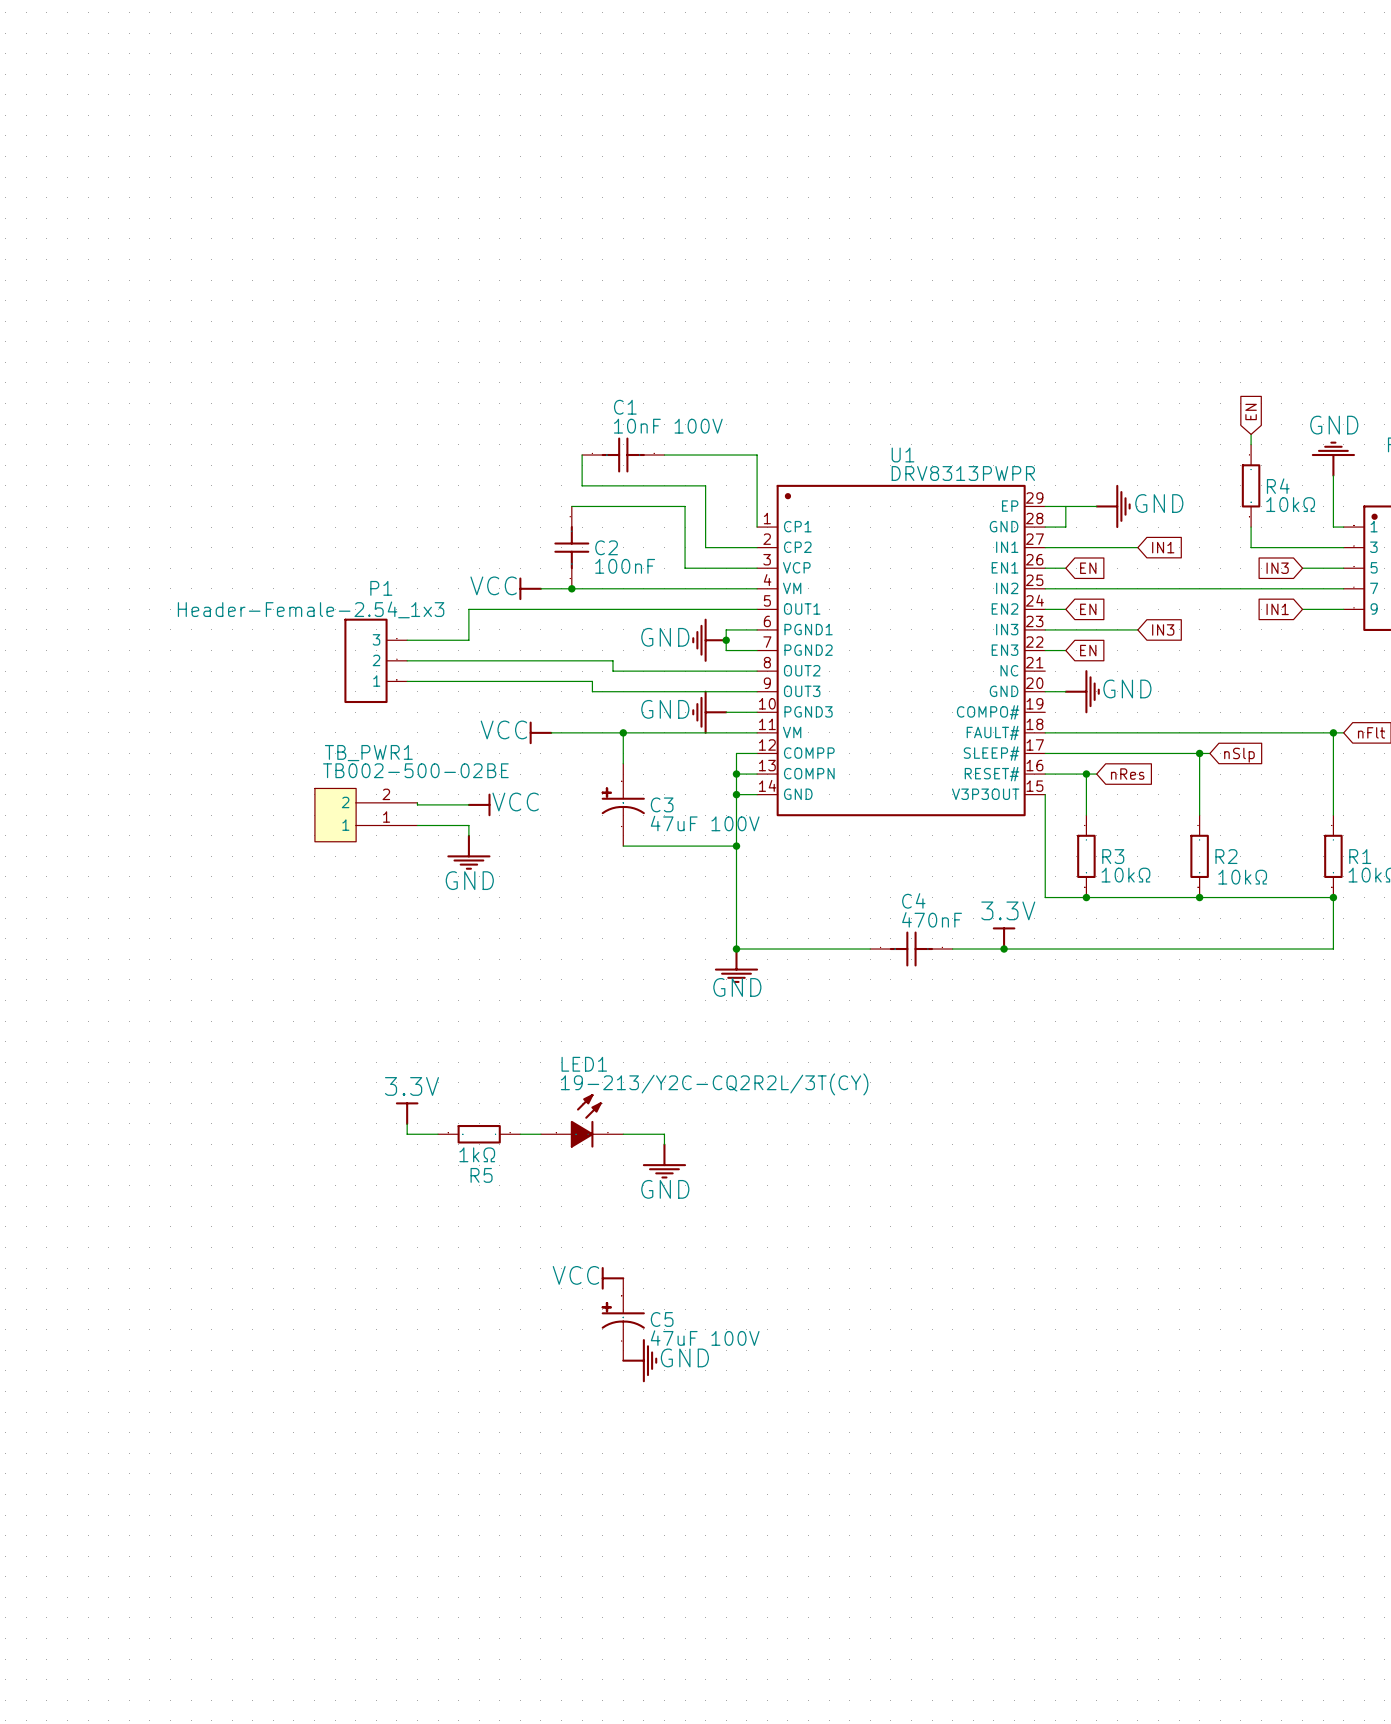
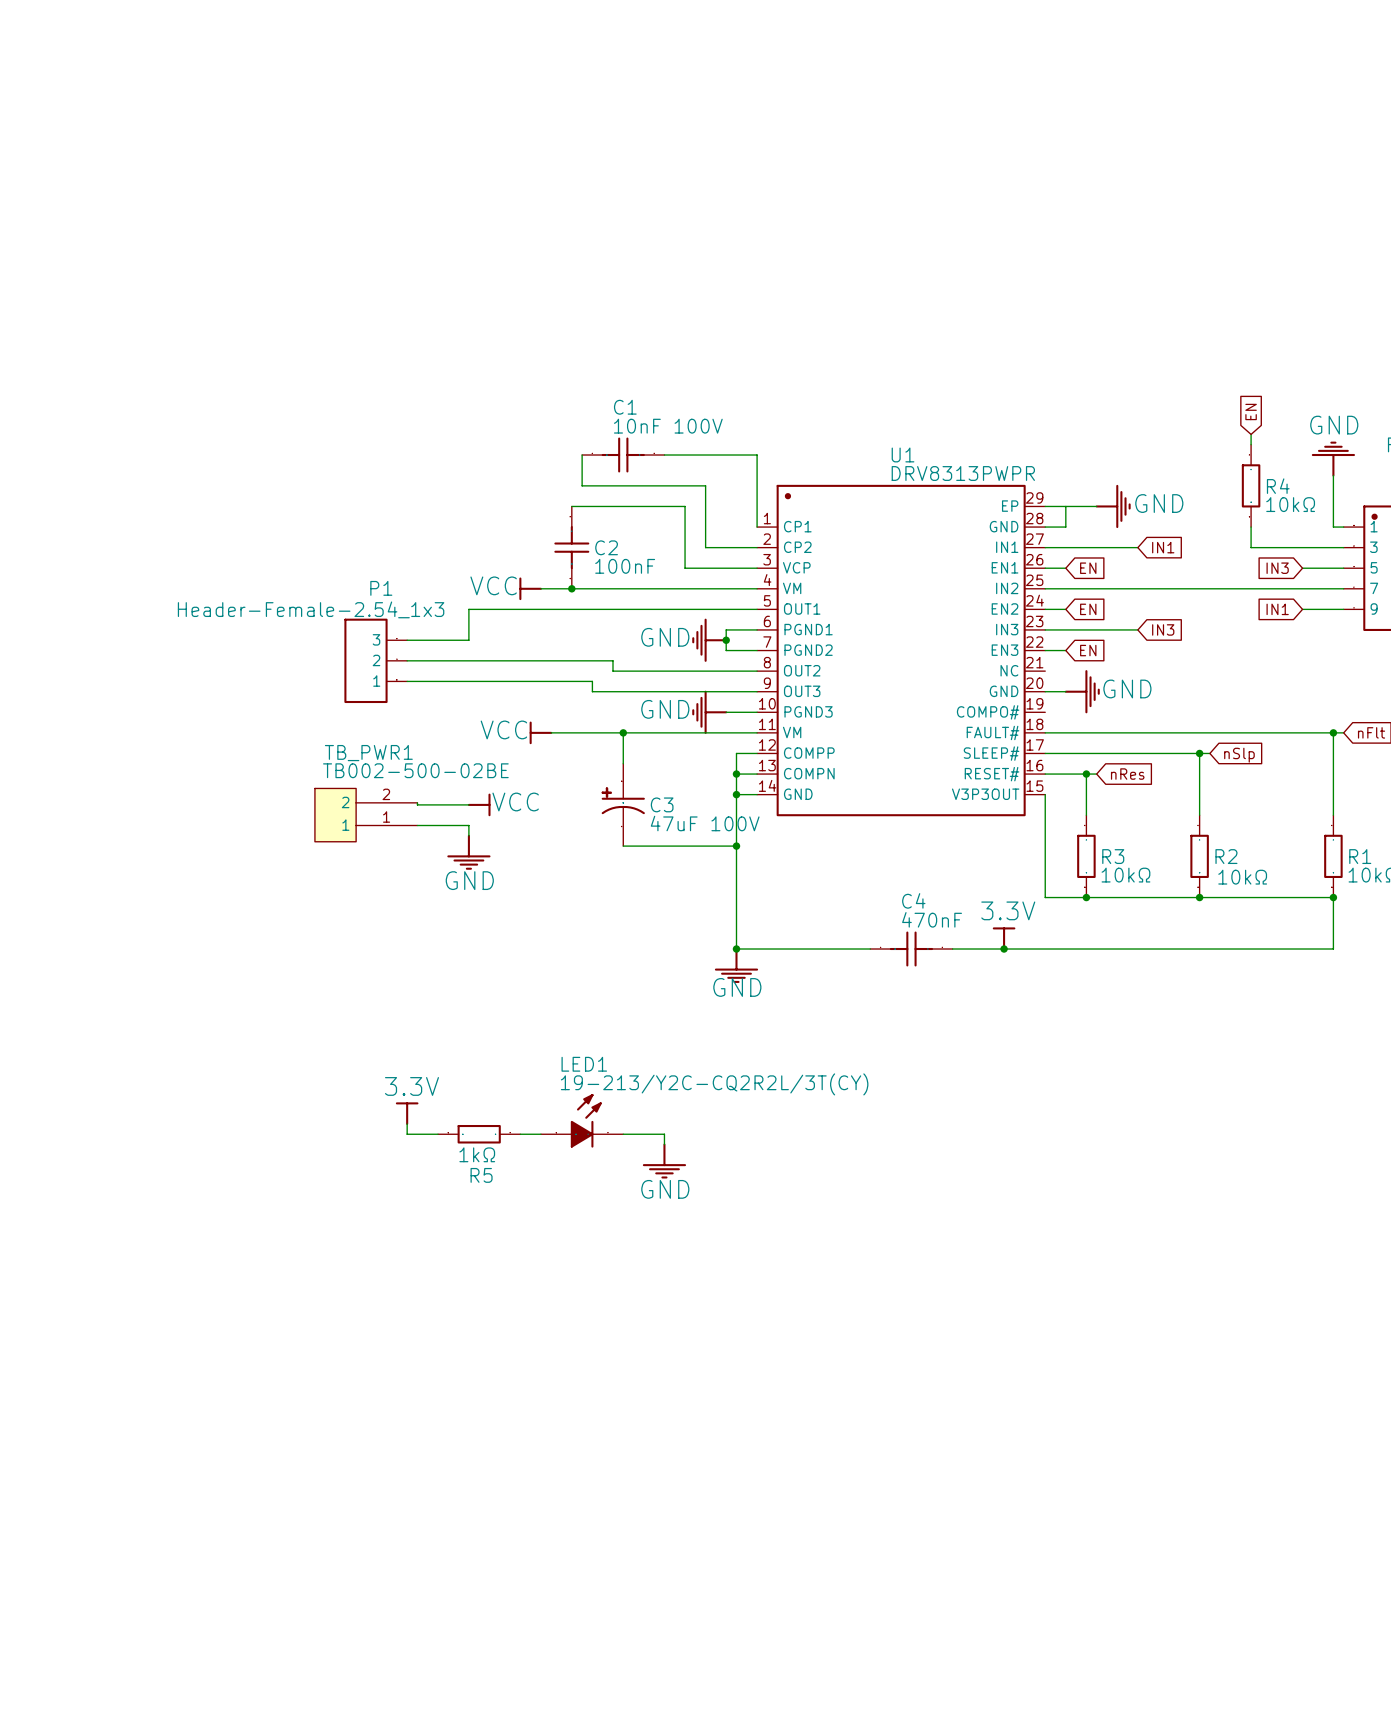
power symbol: VCC (612, 1278) -> none
C5: 47uF 100V (623, 1319) -> none
power symbol: GND (639, 1360) -> none

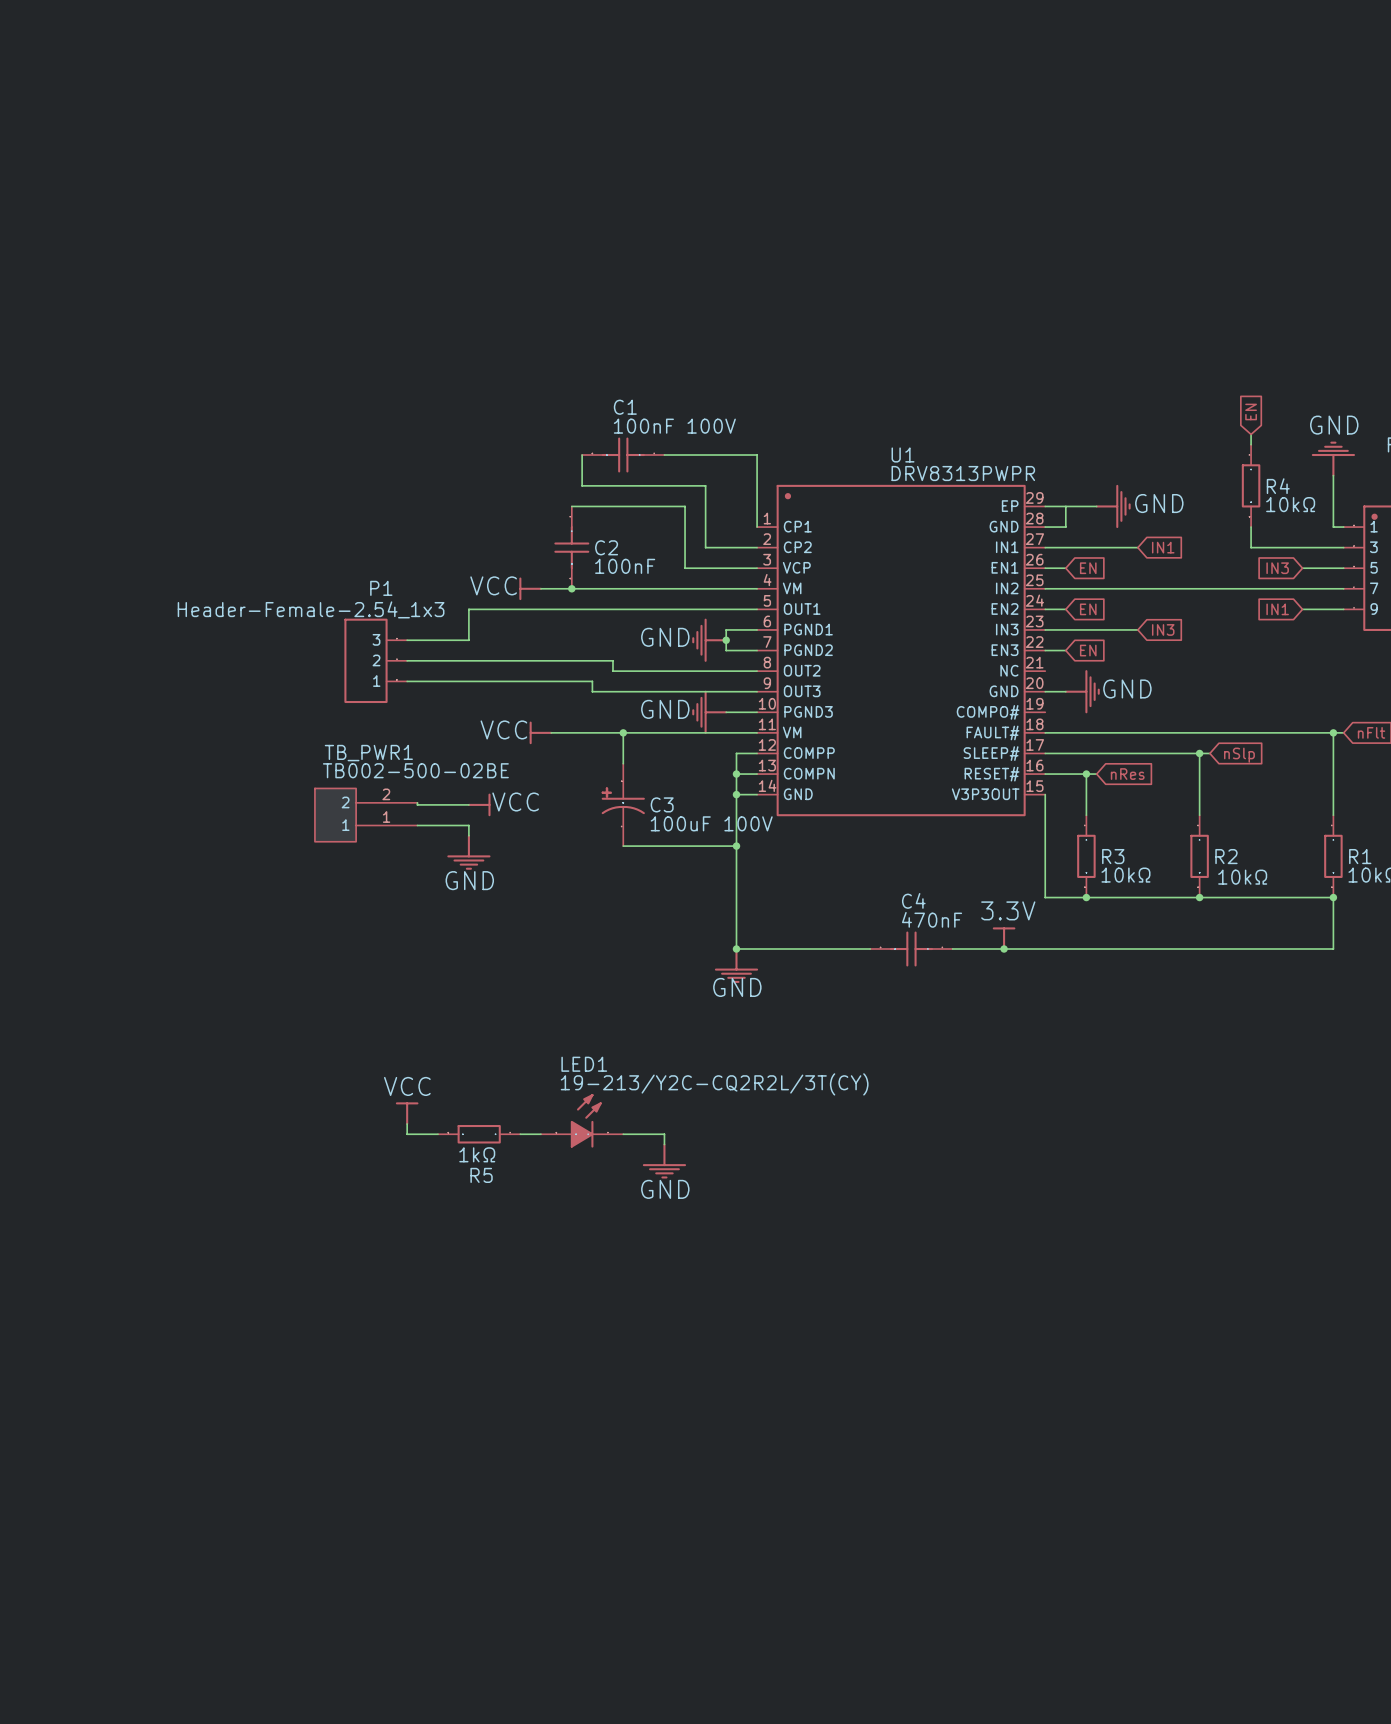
C1 value: 10nF 100V (668, 426) -> 100nF 100V (674, 426)
C3 value: 47uF 100V (705, 823) -> 100uF 100V (711, 823)
power symbol: 3.3V (407, 1113) -> VCC (407, 1113)

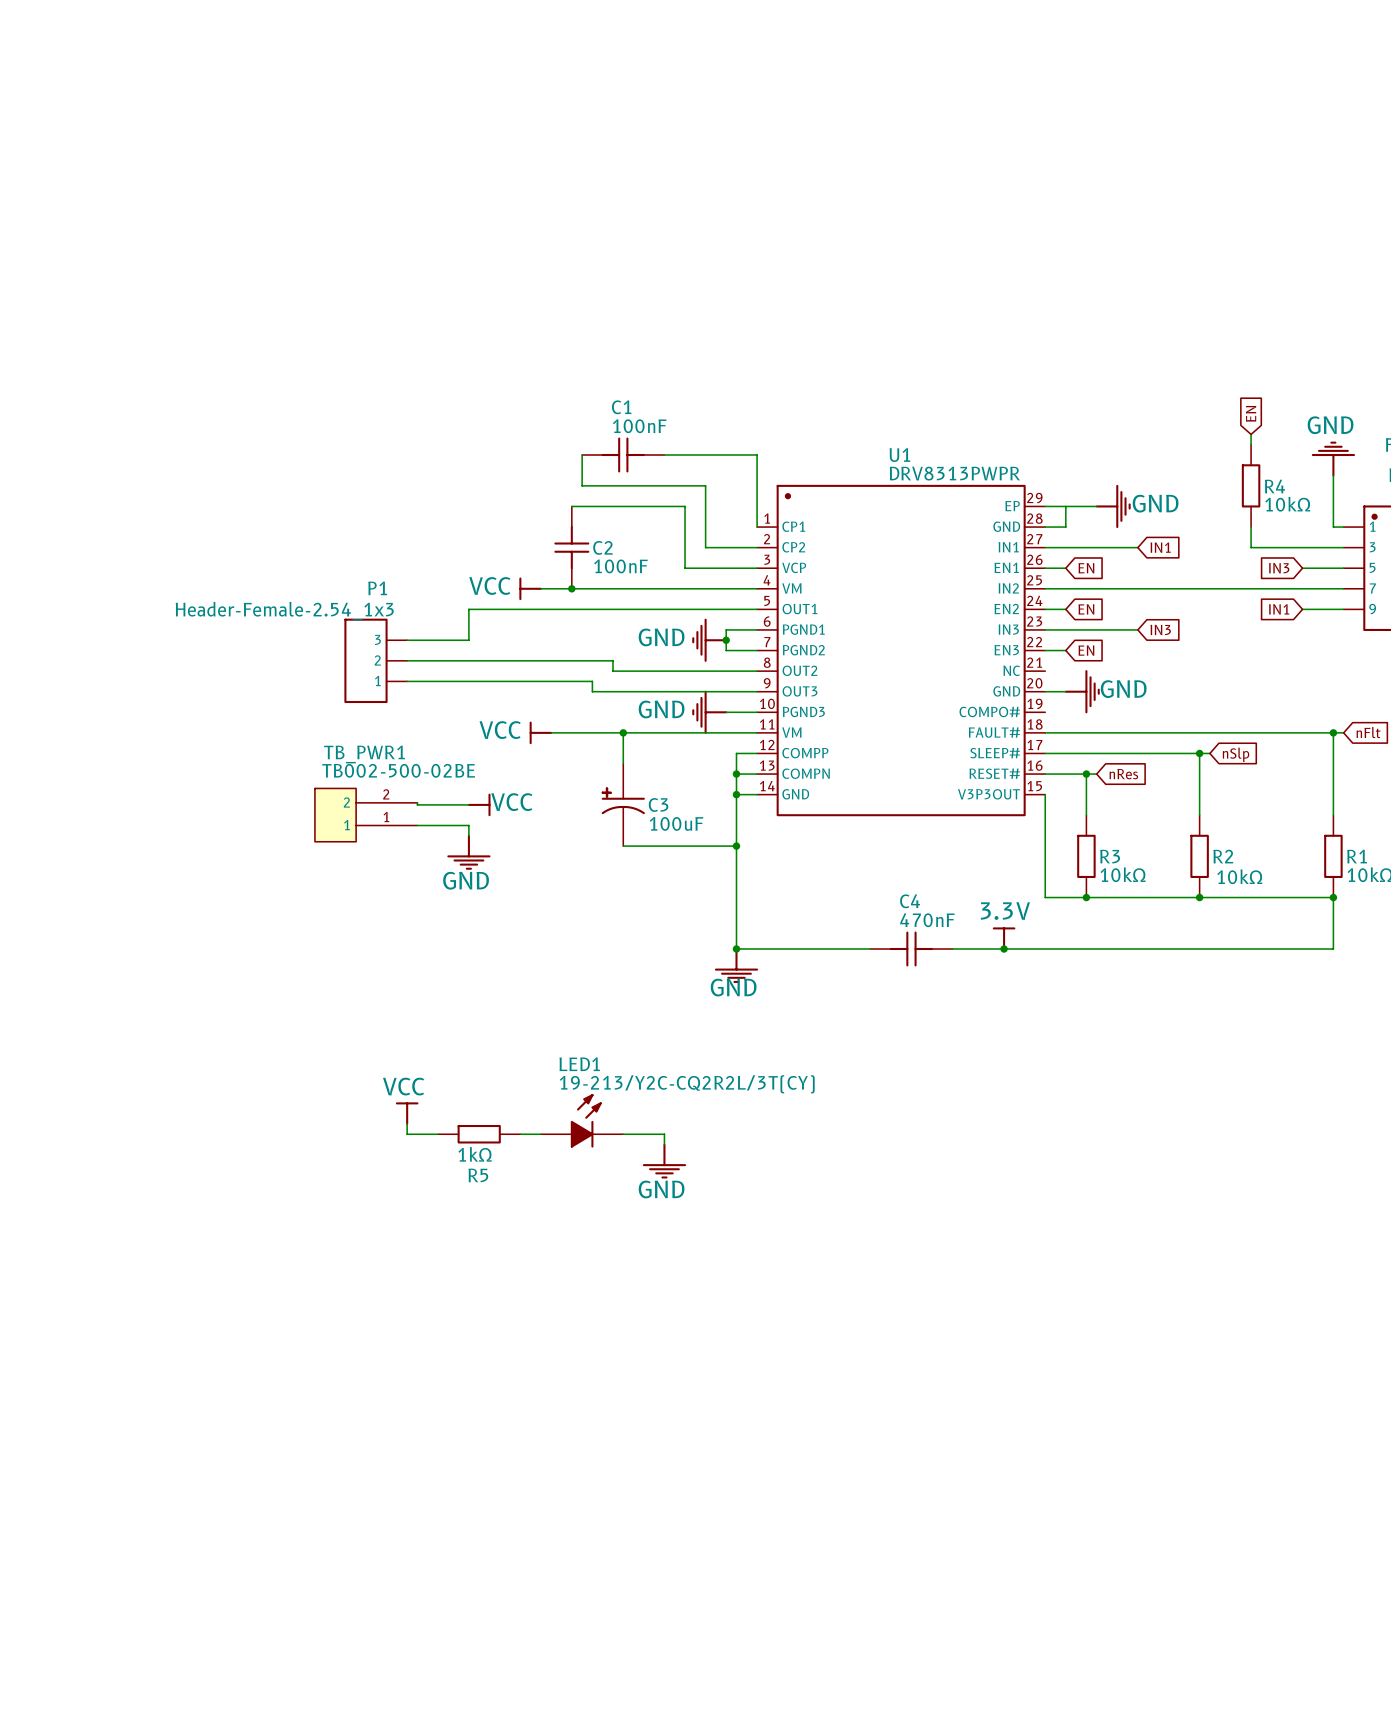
C1 value: 100nF 100V (674, 426) -> 100nF (639, 426)
C3 value: 100uF 100V (711, 823) -> 100uF (676, 823)

